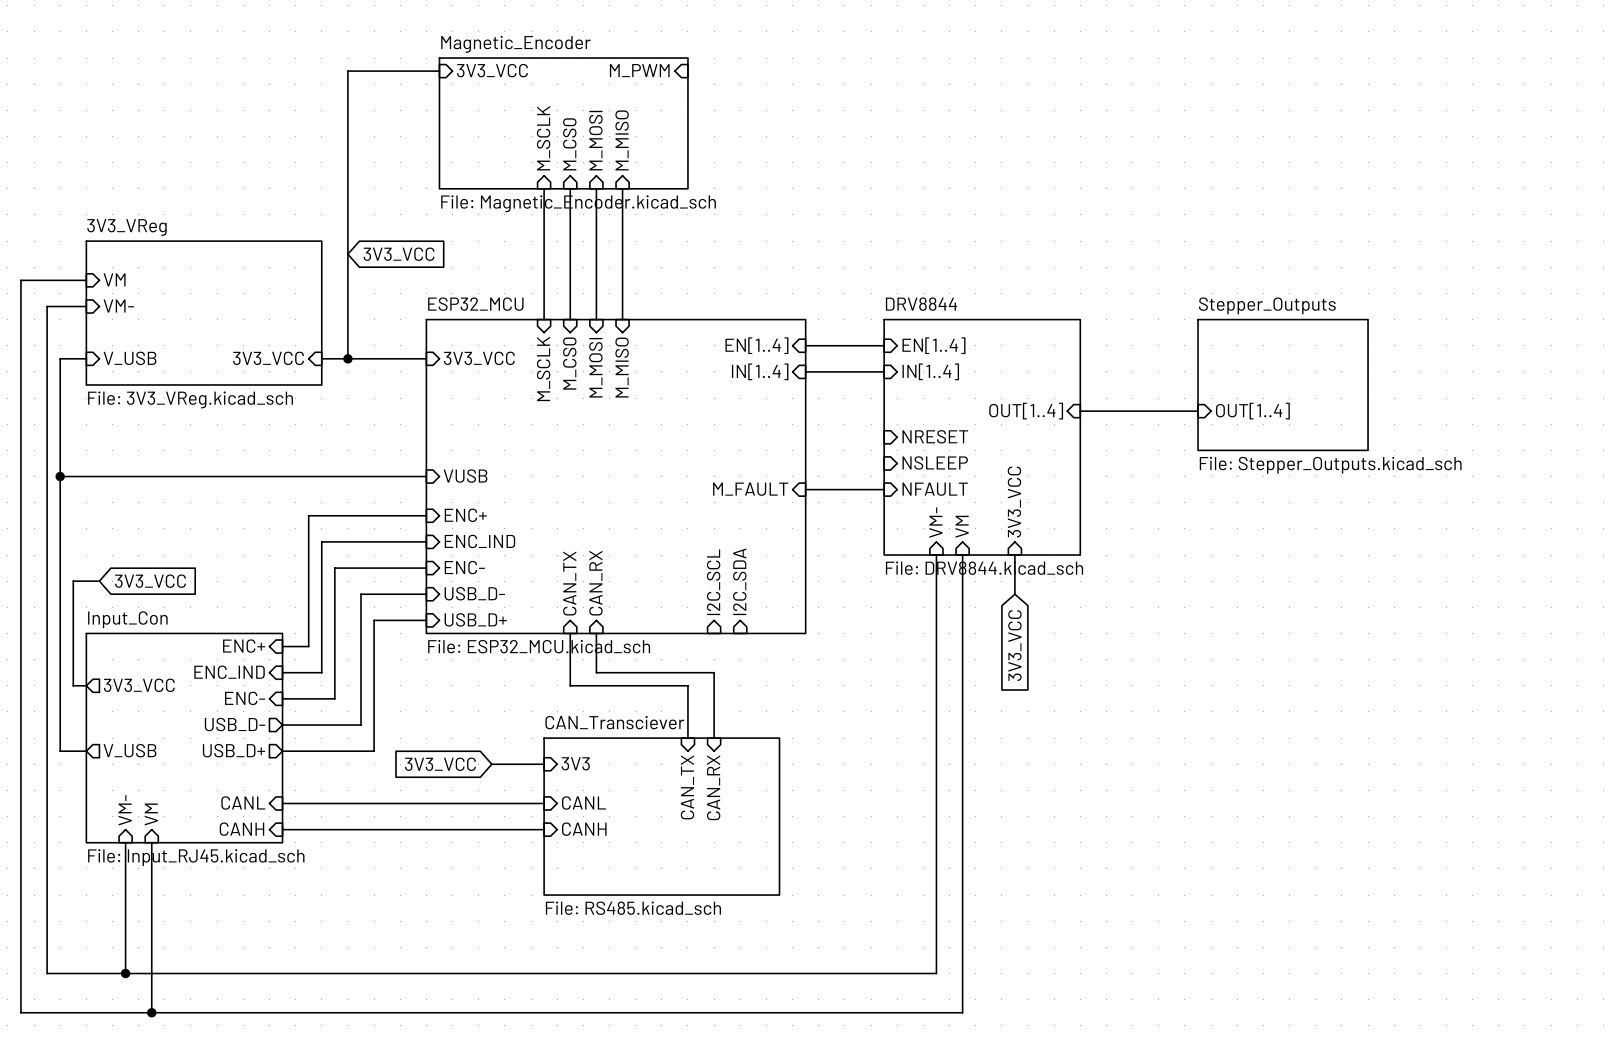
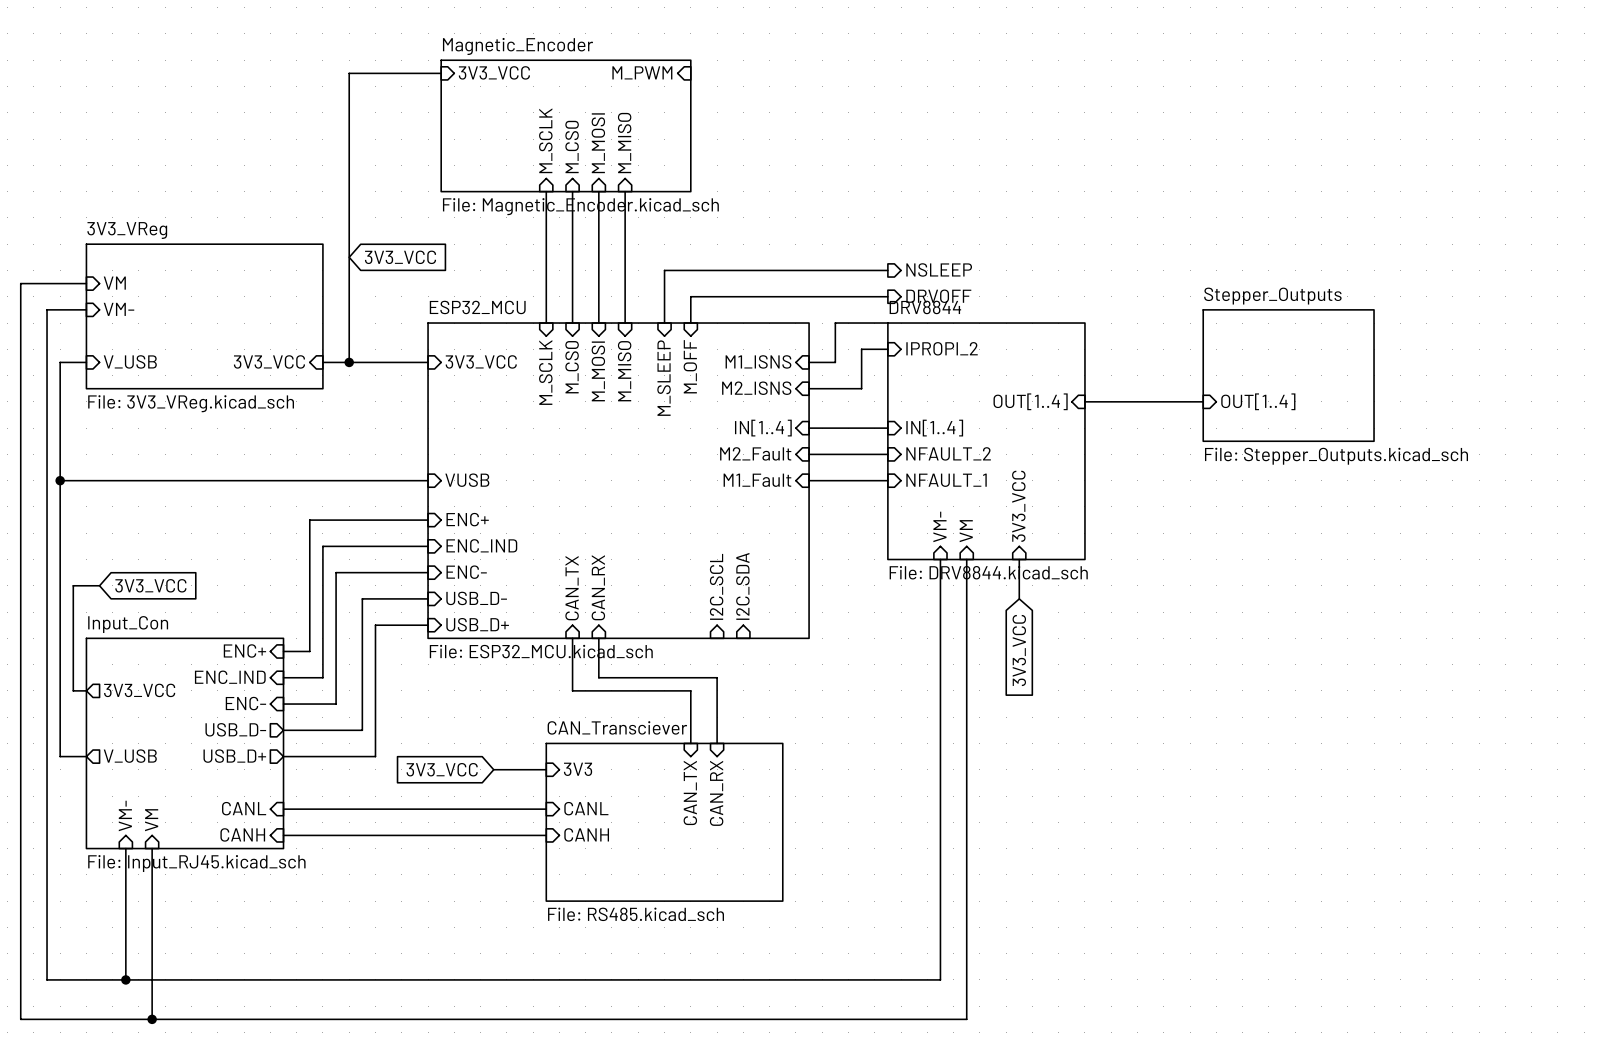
wire: none -> (887, 270) (664, 270) (664, 323)
sheet pin: none -> DRVOFF (938, 296)
wire: none -> (887, 296) (690, 296) (690, 323)
wire: none -> (887, 323) (835, 323) (835, 362) (809, 362)
sheet pin: EN[1..4] (756, 345) -> none
bus: (805, 345) (884, 345) -> none
wire: none -> (887, 349) (861, 349) (861, 388) (809, 388)
sheet pin: EN[1..4] (933, 345) -> IPROPI_2 (942, 348)
sheet pin: none -> M1_ISNS (758, 361)
sheet pin: none -> M_OFF (690, 366)
sheet pin position: IN[1..4] (760, 371) -> IN[1..4] (763, 428)
bus: (805, 371) (884, 371) -> (809, 428) (887, 428)
sheet pin position: IN[1..4] (930, 371) -> IN[1..4] (934, 428)
sheet pin: none -> M_SLEEP (664, 378)
sheet pin: none -> M2_ISNS (756, 388)
sheet Stepper_Outputs position: (1283, 384) -> (1288, 375)
sheet pin position: OUT[1..4] (1026, 411) -> OUT[1..4] (1030, 401)
bus: (1080, 411) (1198, 411) -> (1084, 401) (1203, 401)
sheet pin position: OUT[1..4] (1252, 411) -> OUT[1..4] (1258, 401)
sheet pin: NRESET (935, 436) -> none
sheet pin: none -> M2_Fault (755, 453)
sheet pin: none -> NFAULT_2 (948, 453)
wire: none -> (809, 454) (887, 454)
sheet pin position: NSLEEP (935, 462) -> NSLEEP (939, 269)
sheet pin: none -> M1_Fault (757, 480)
sheet pin: M_FAULT (750, 489) -> none
wire: (805, 489) (884, 489) -> (809, 480) (887, 480)
sheet pin: NFAULT (935, 489) -> NFAULT_1 (946, 480)

